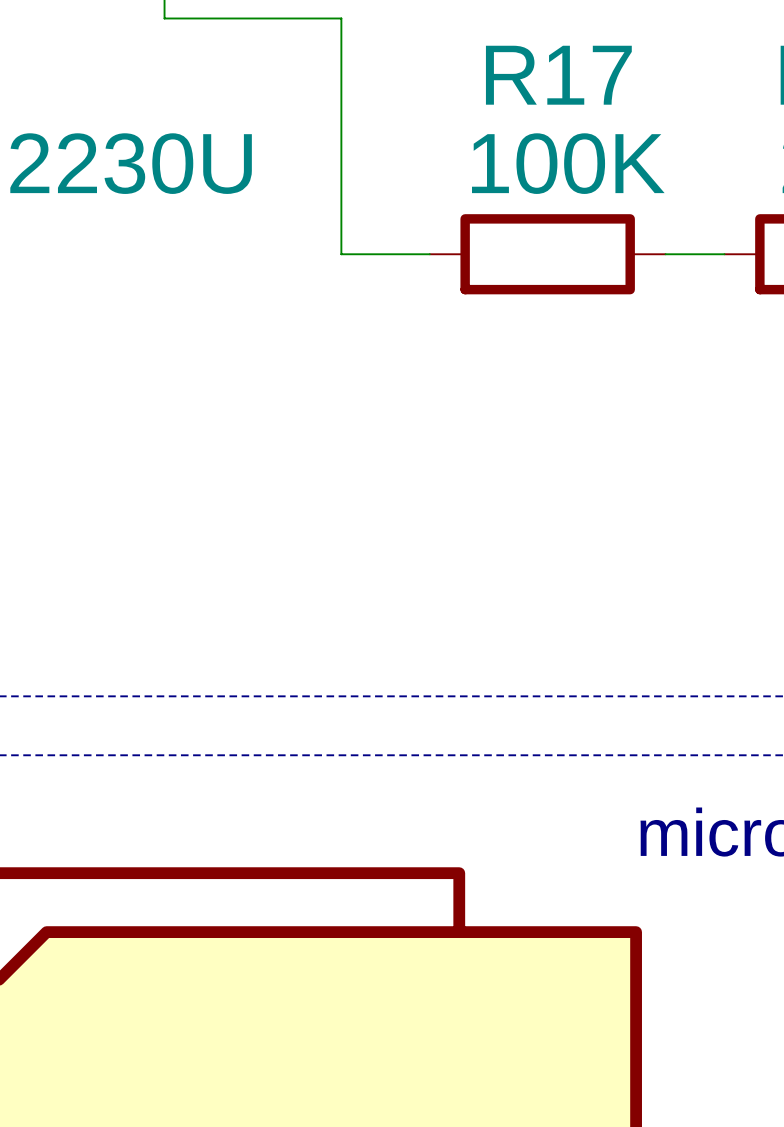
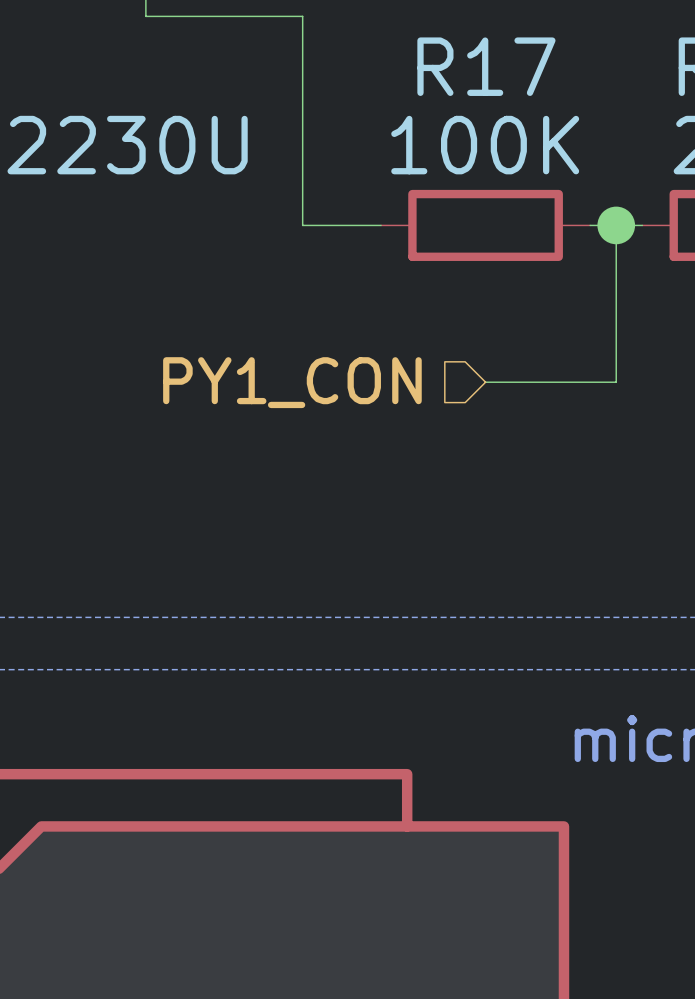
wire: none -> (616, 225) (616, 382) (485, 382)
junction: none -> (616, 225)
hierarchical label: none -> PY1_CON (292, 382)

